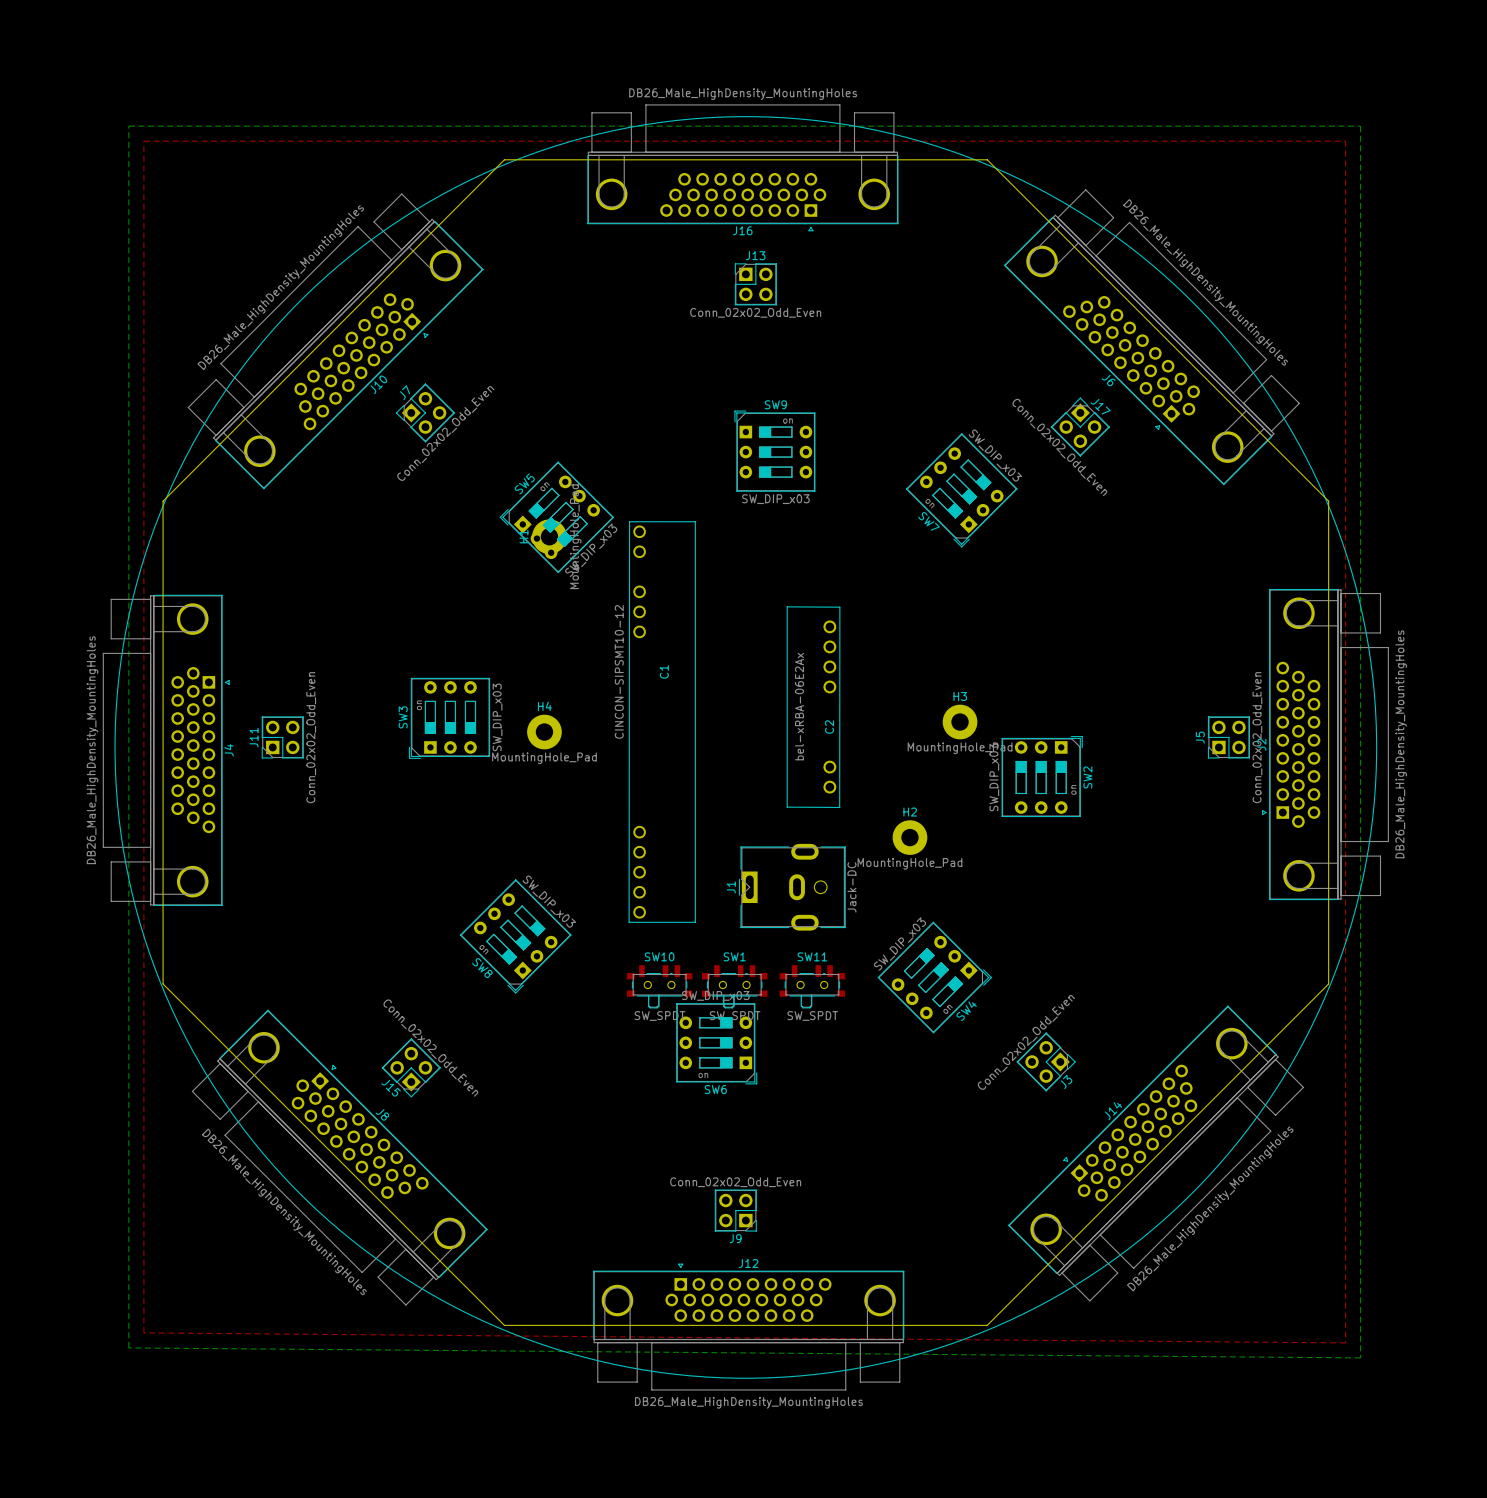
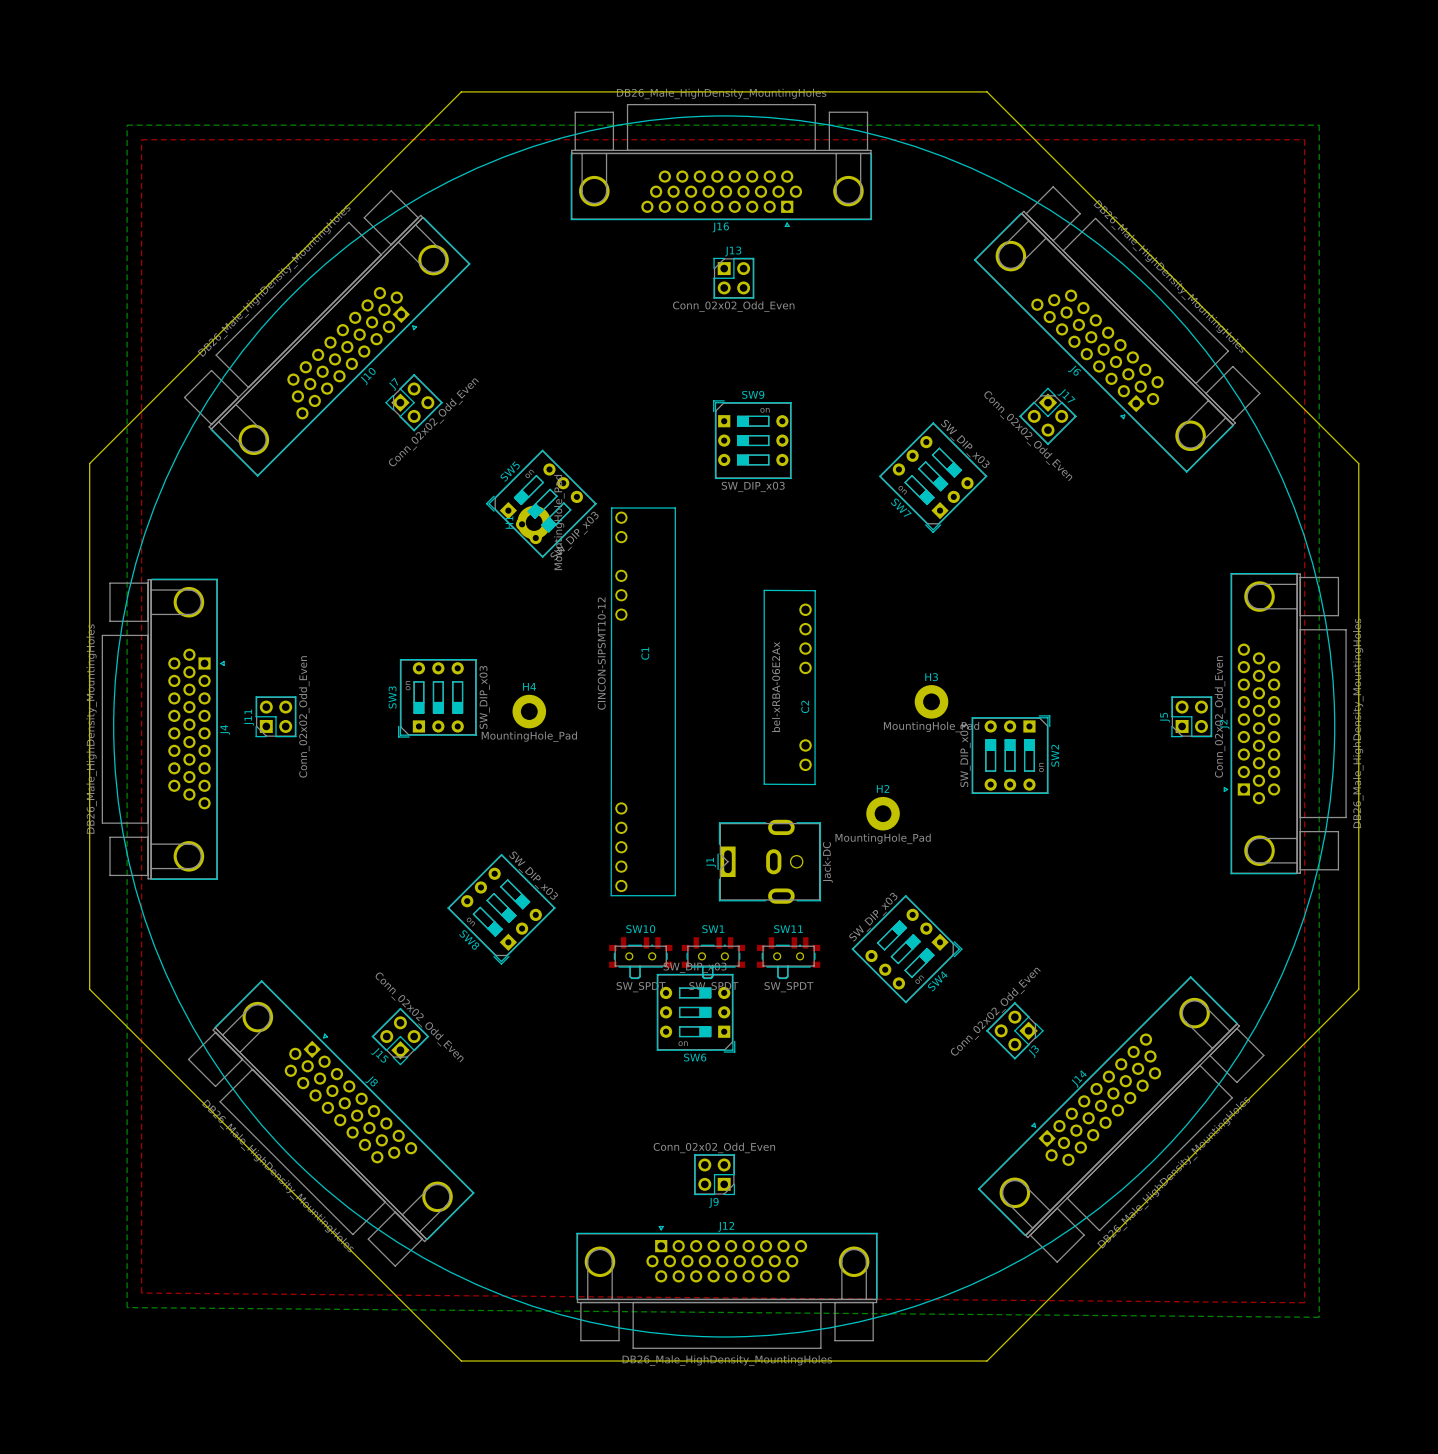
board edge: (504, 159) (163, 501) (163, 984) (504, 1325) (987, 1325) (1328, 984) (1328, 501) (987, 159) (504, 159) -> (461, 91) (89, 463) (89, 989) (461, 1361) (987, 1361) (1358, 989) (1358, 463) (987, 91) (461, 91)

